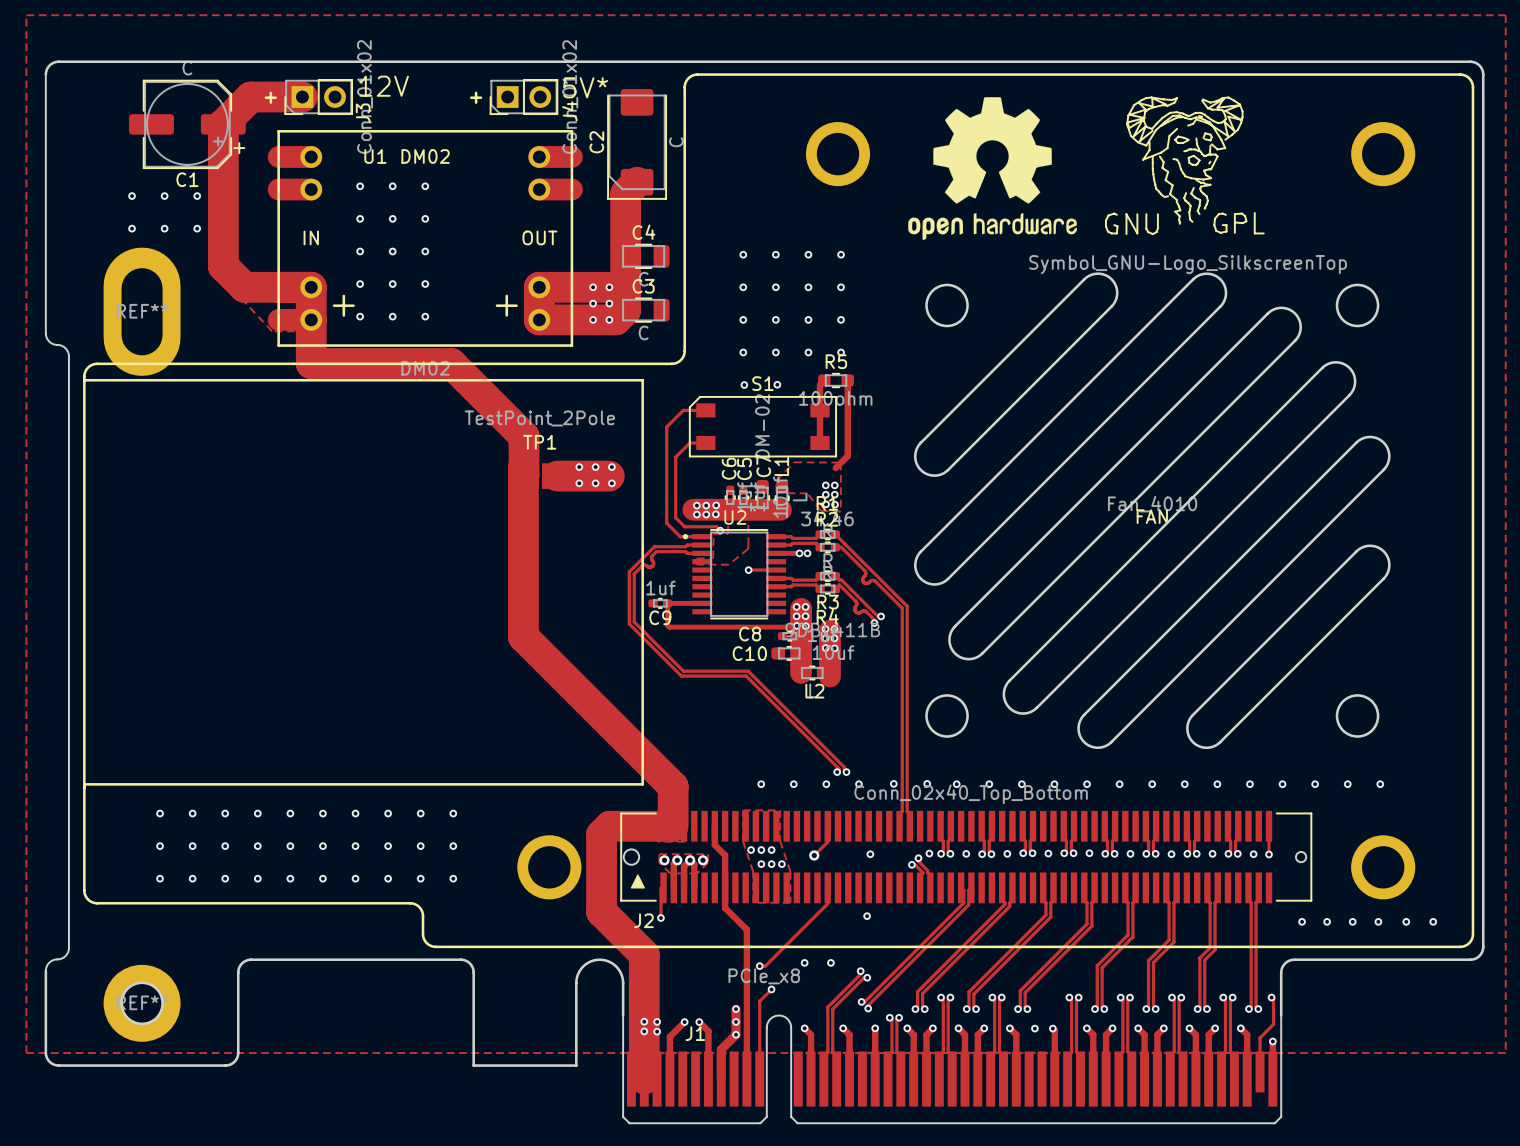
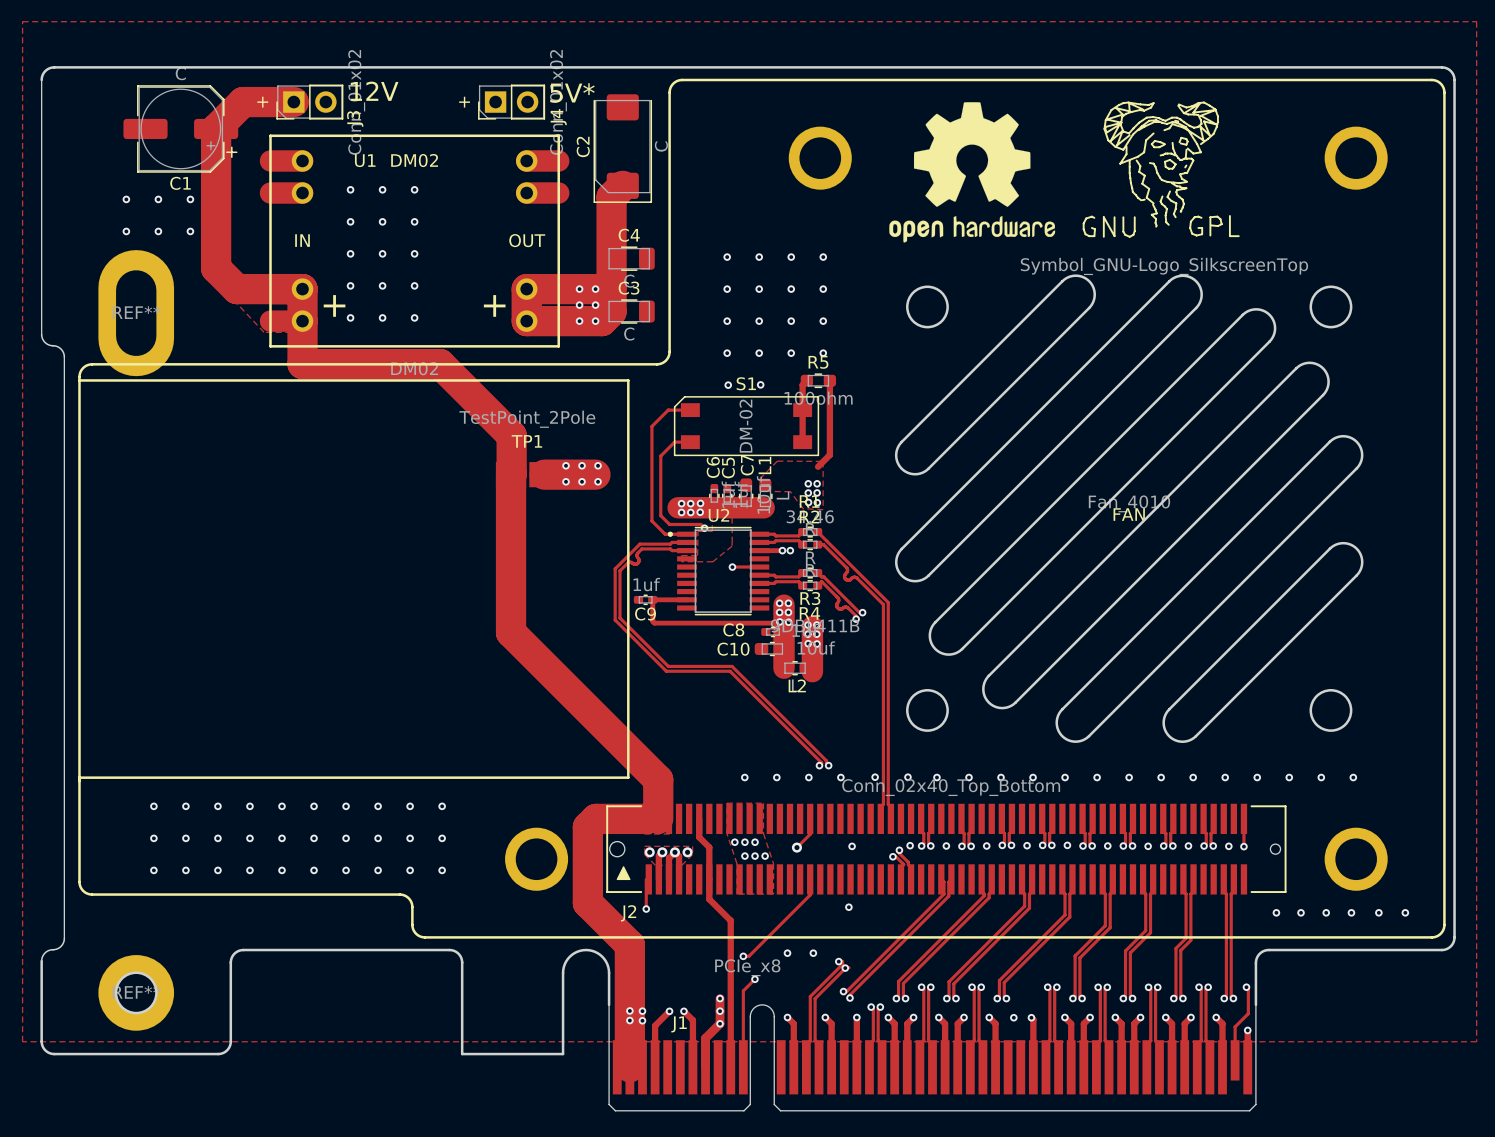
via: none -> (838, 961)
via: (860, 971) -> none
via: (867, 977) -> none
via: none -> (845, 968)

